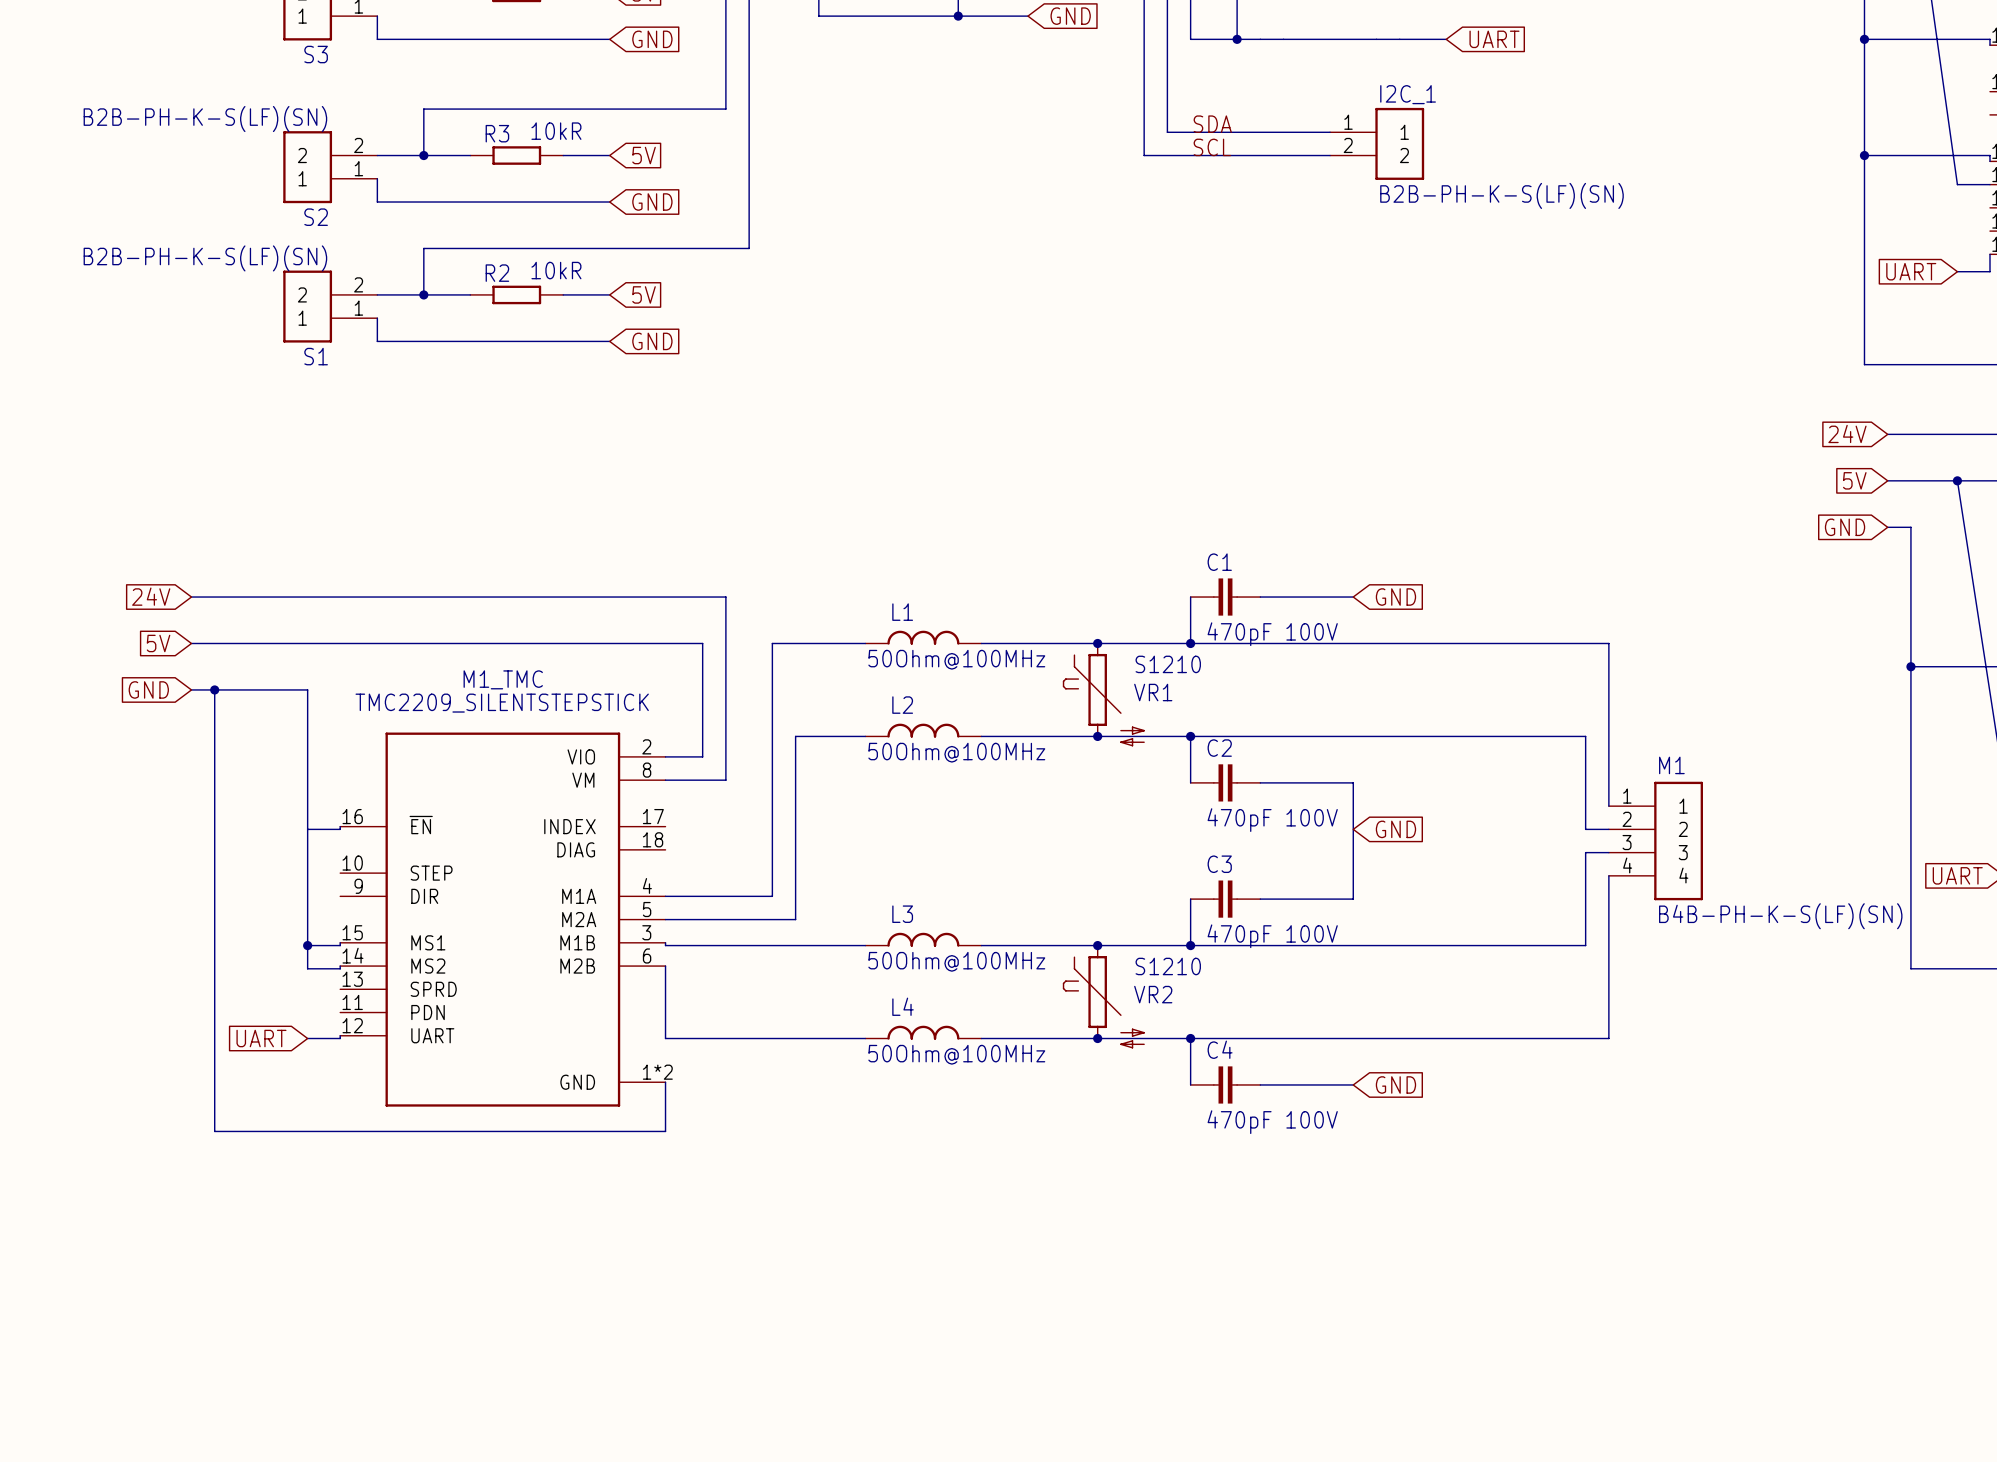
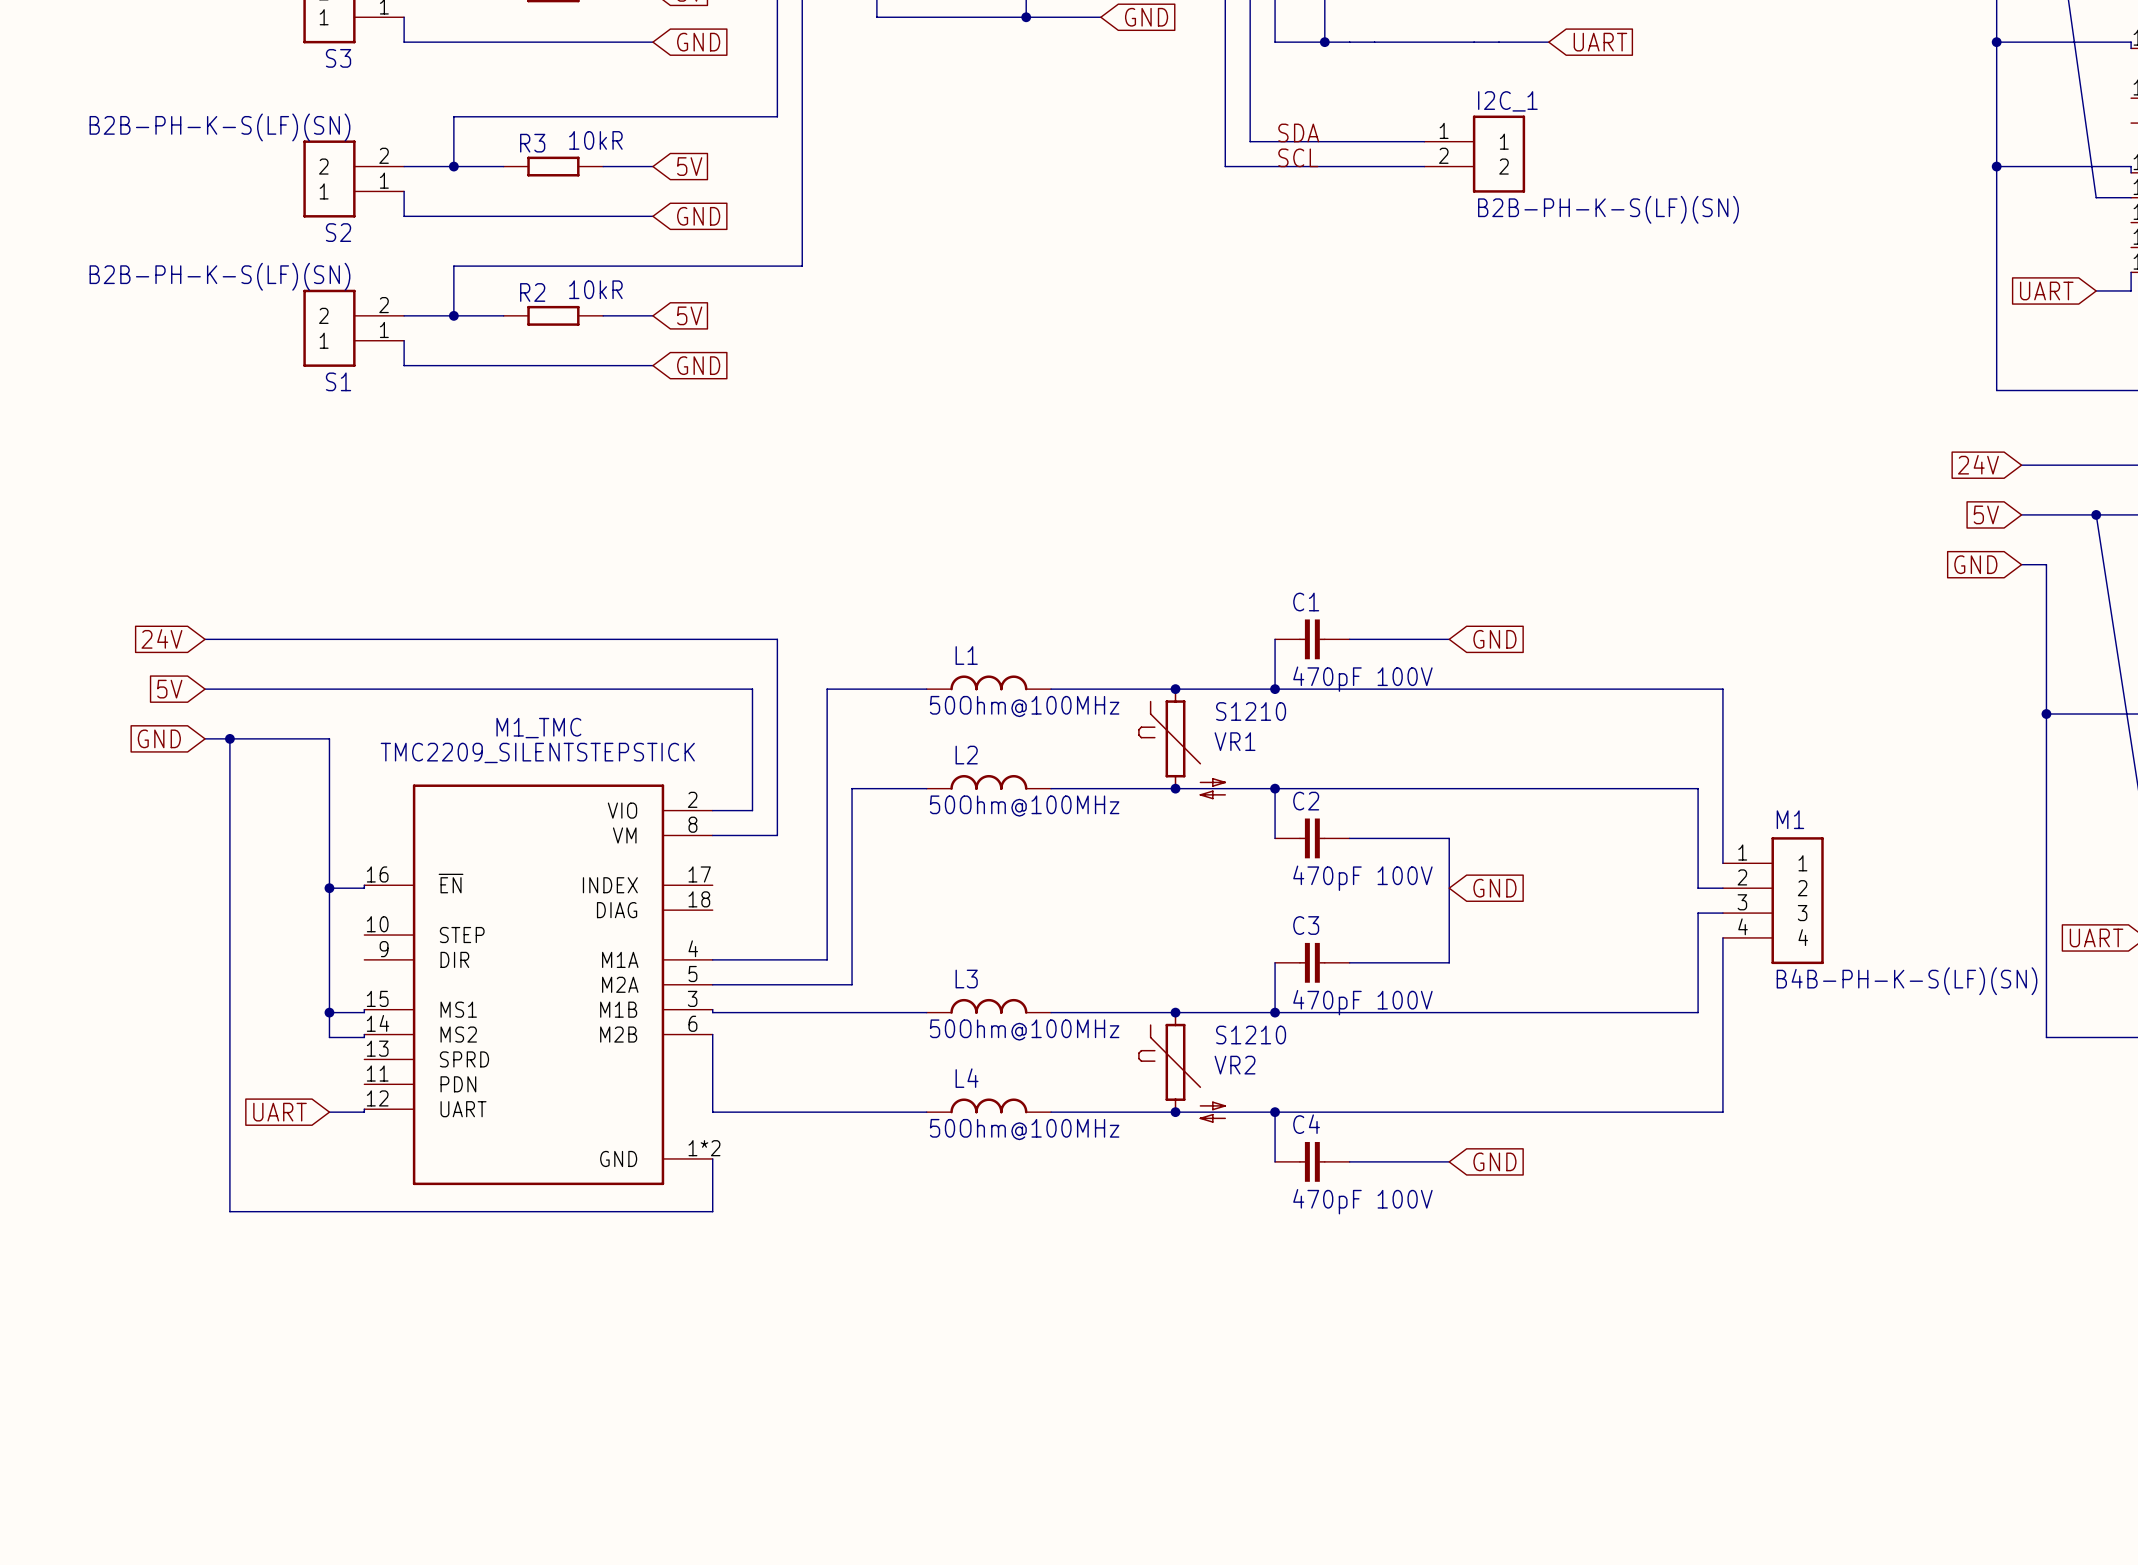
junction: none -> (329, 888)

